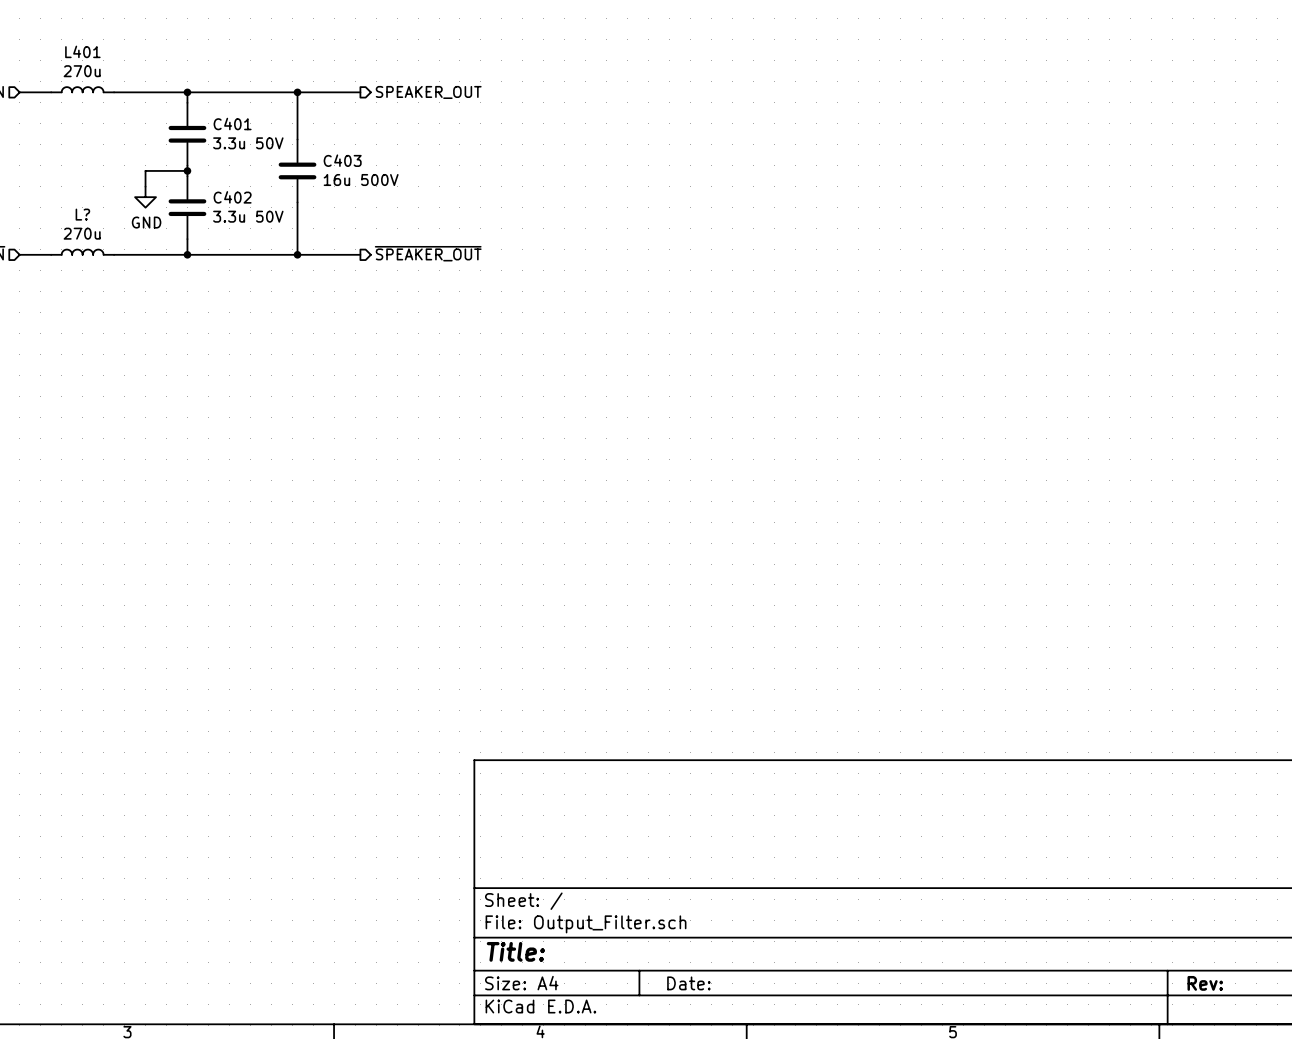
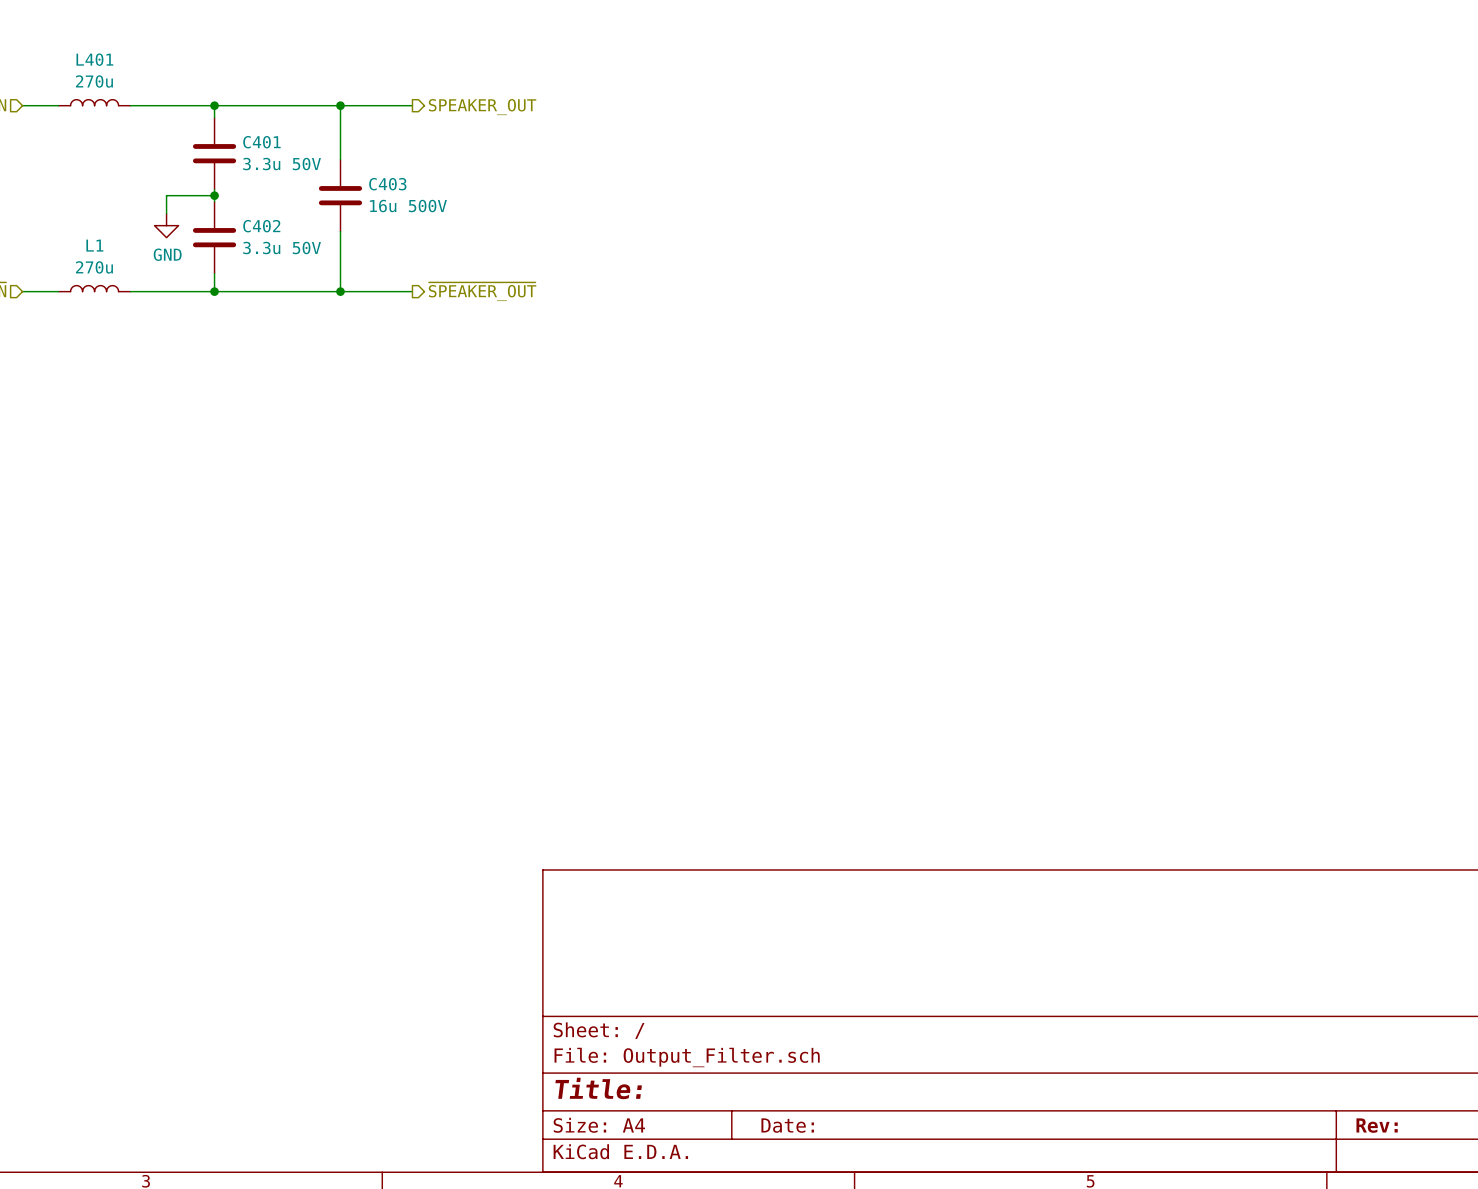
L? name: L? (82, 214) -> L1 (94, 245)

